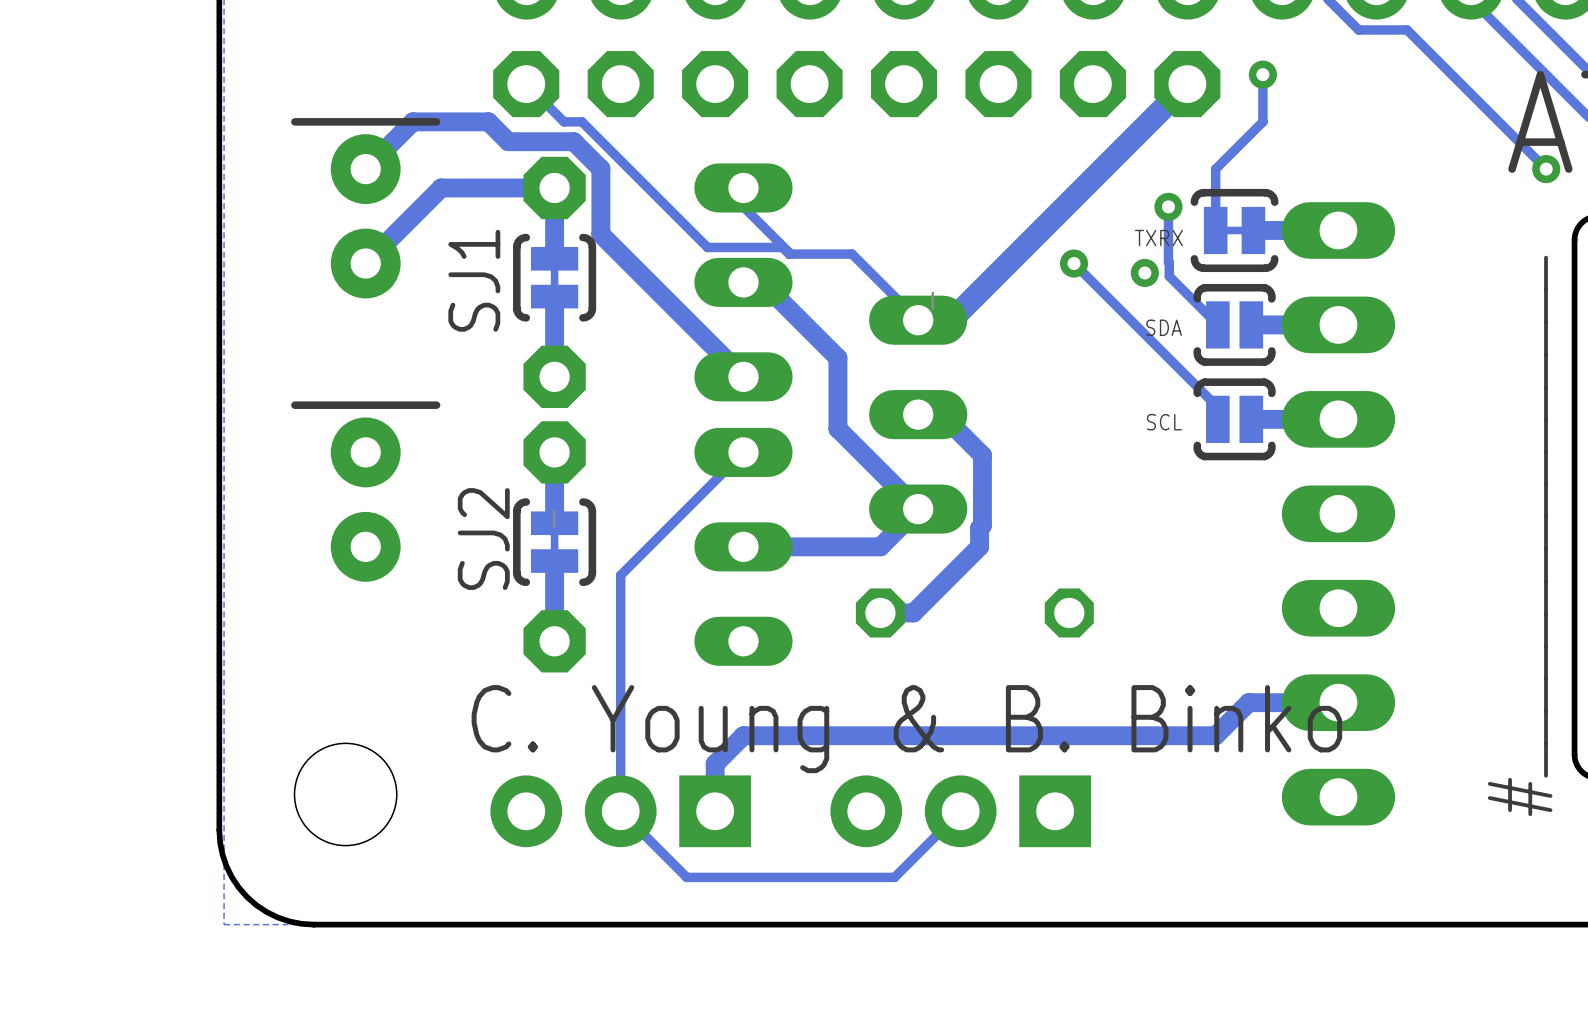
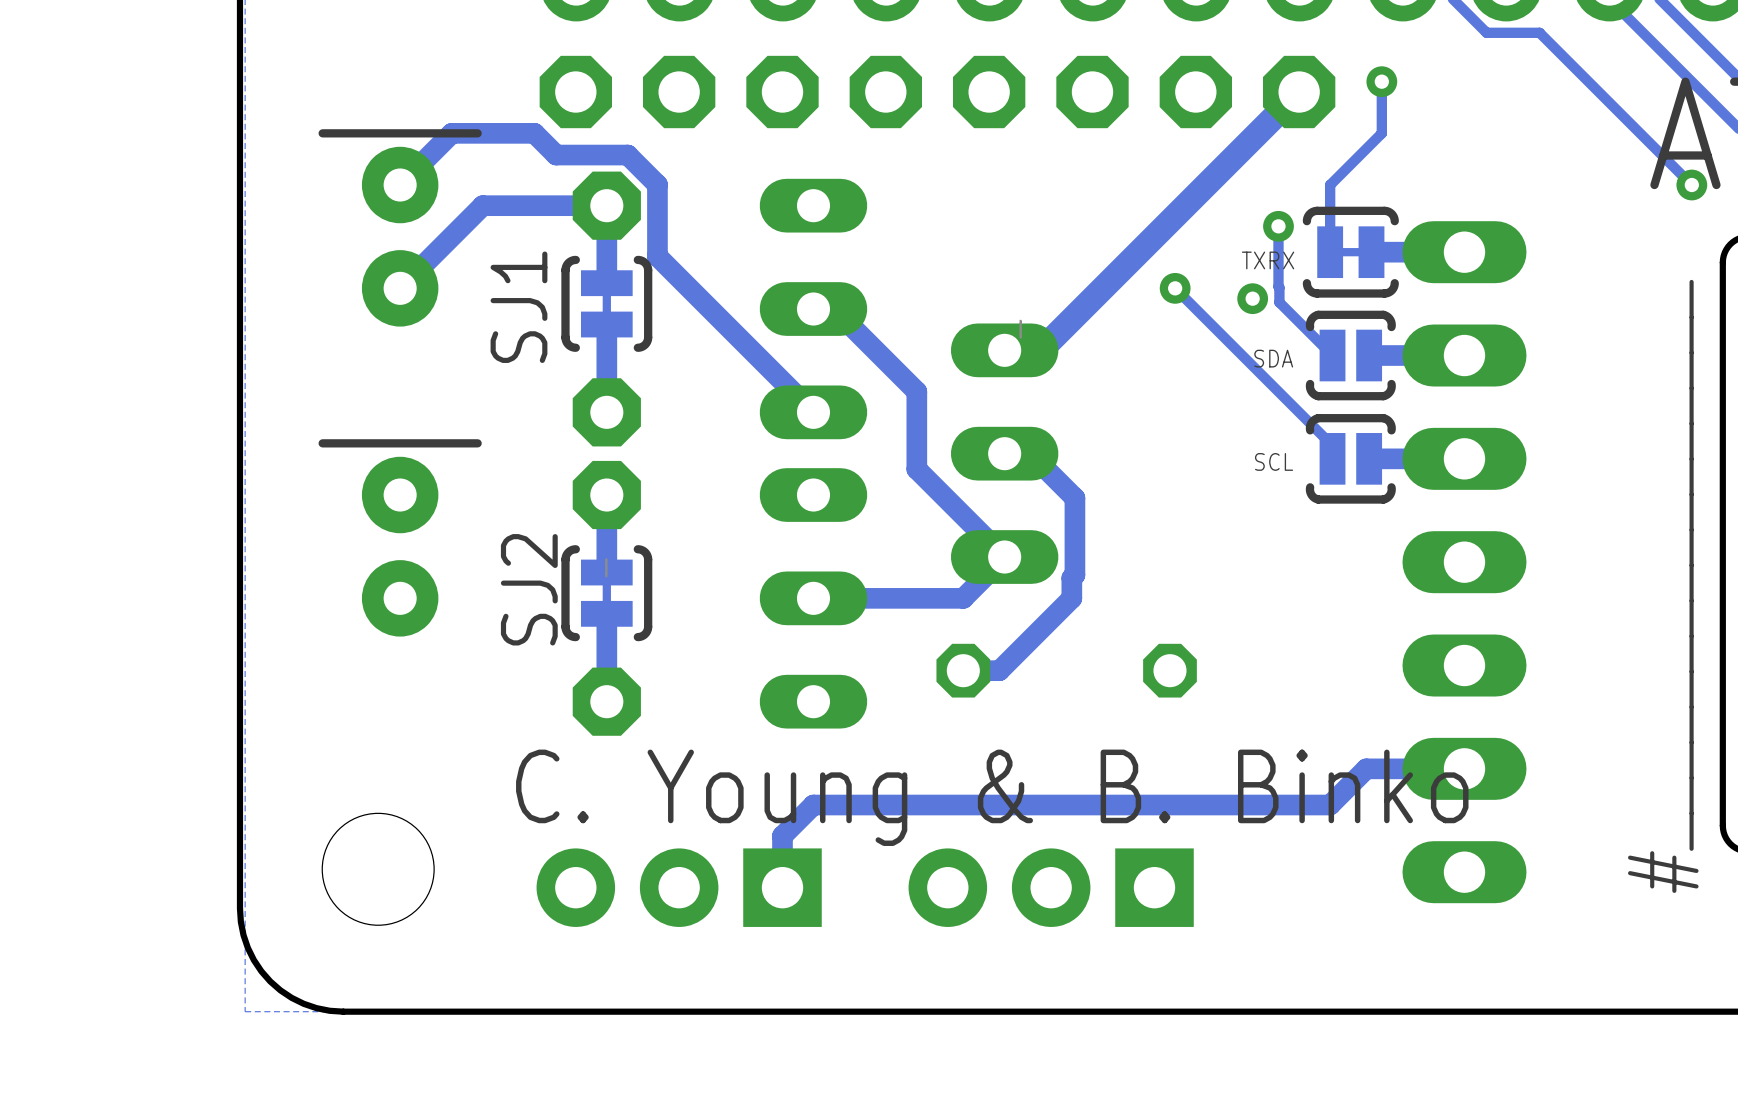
track: (526, 84) (564, 121) (581, 121) (707, 247) (782, 247) (789, 254) (852, 254) (918, 320) -> none
track: (743, 187) (743, 206) (790, 254) -> none
track: (743, 452) (620, 575) (620, 811) (686, 877) (894, 877) (960, 811) -> none

